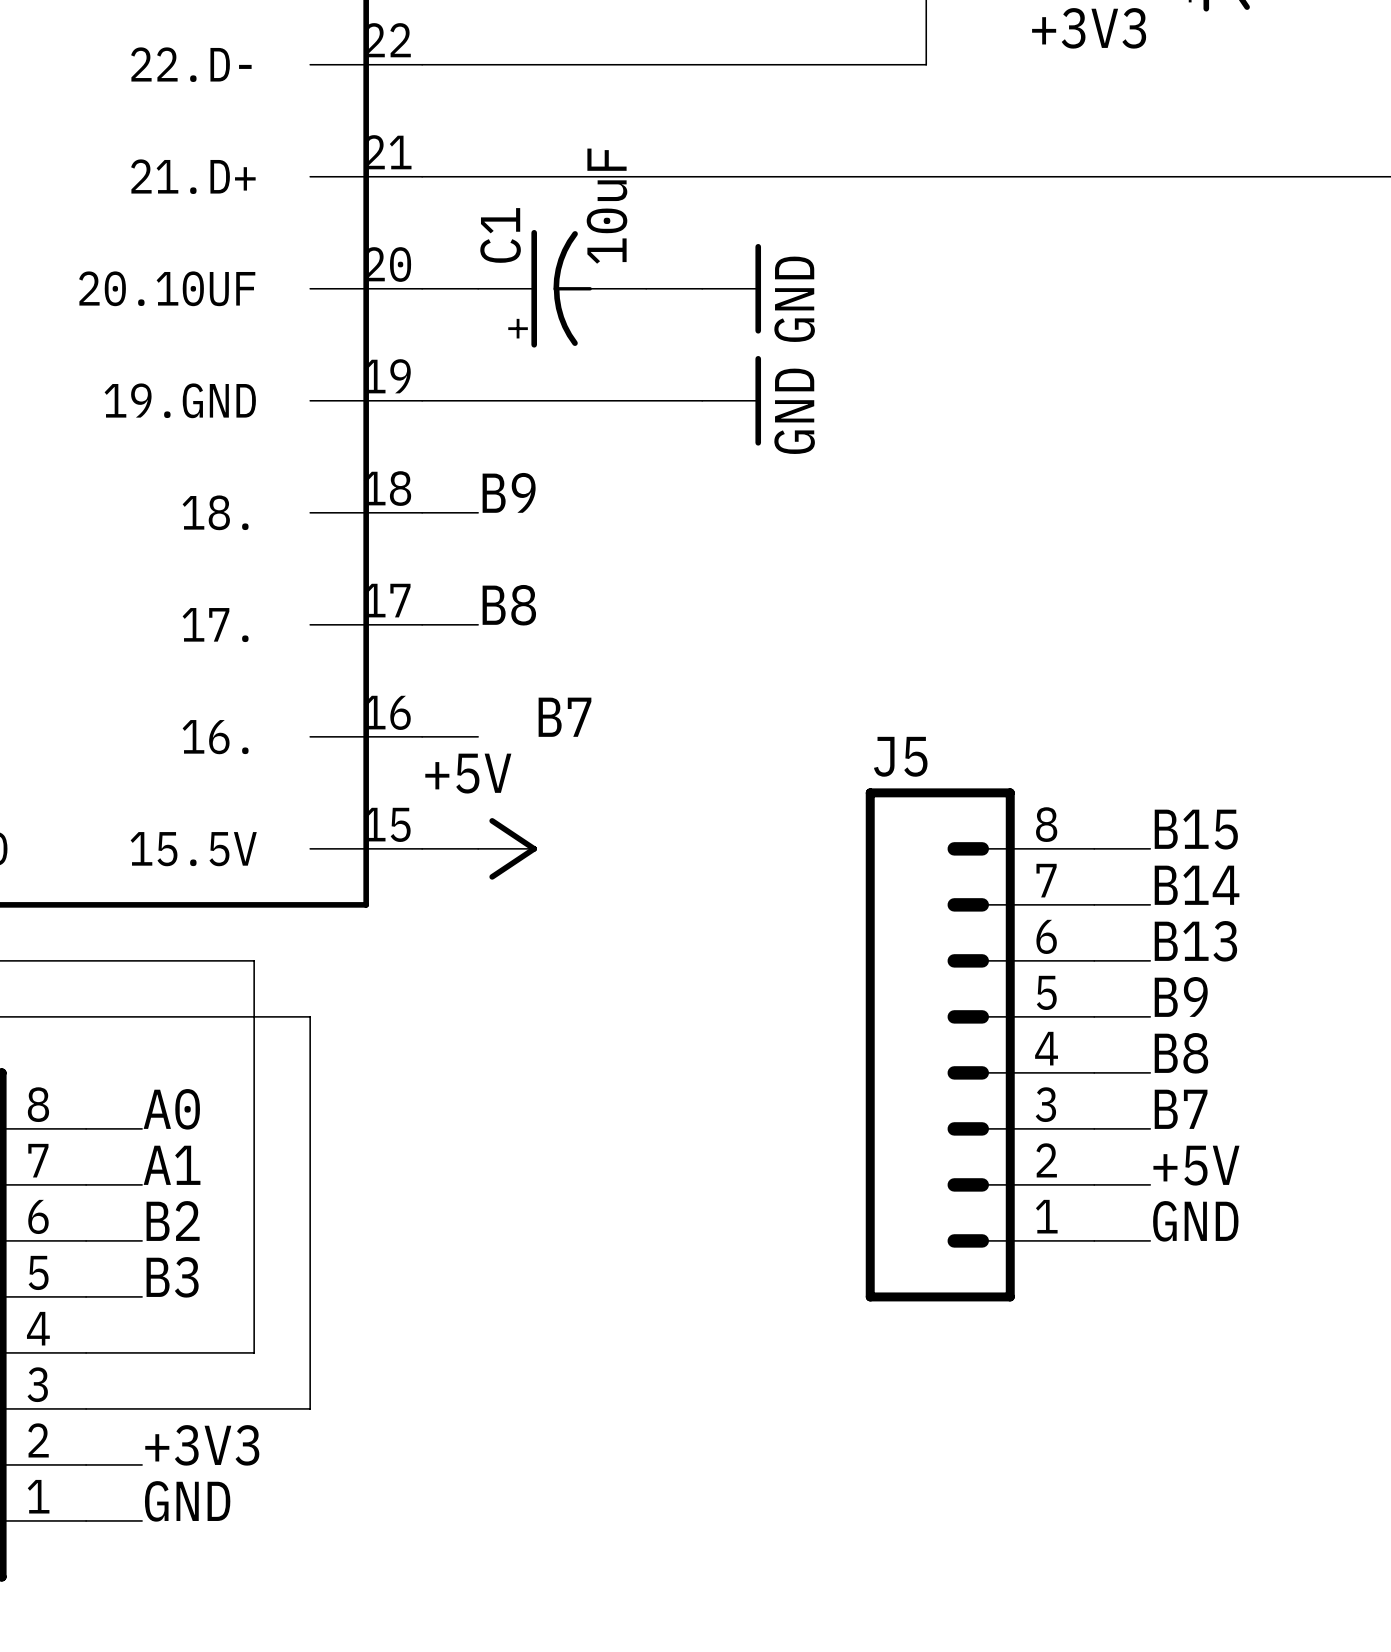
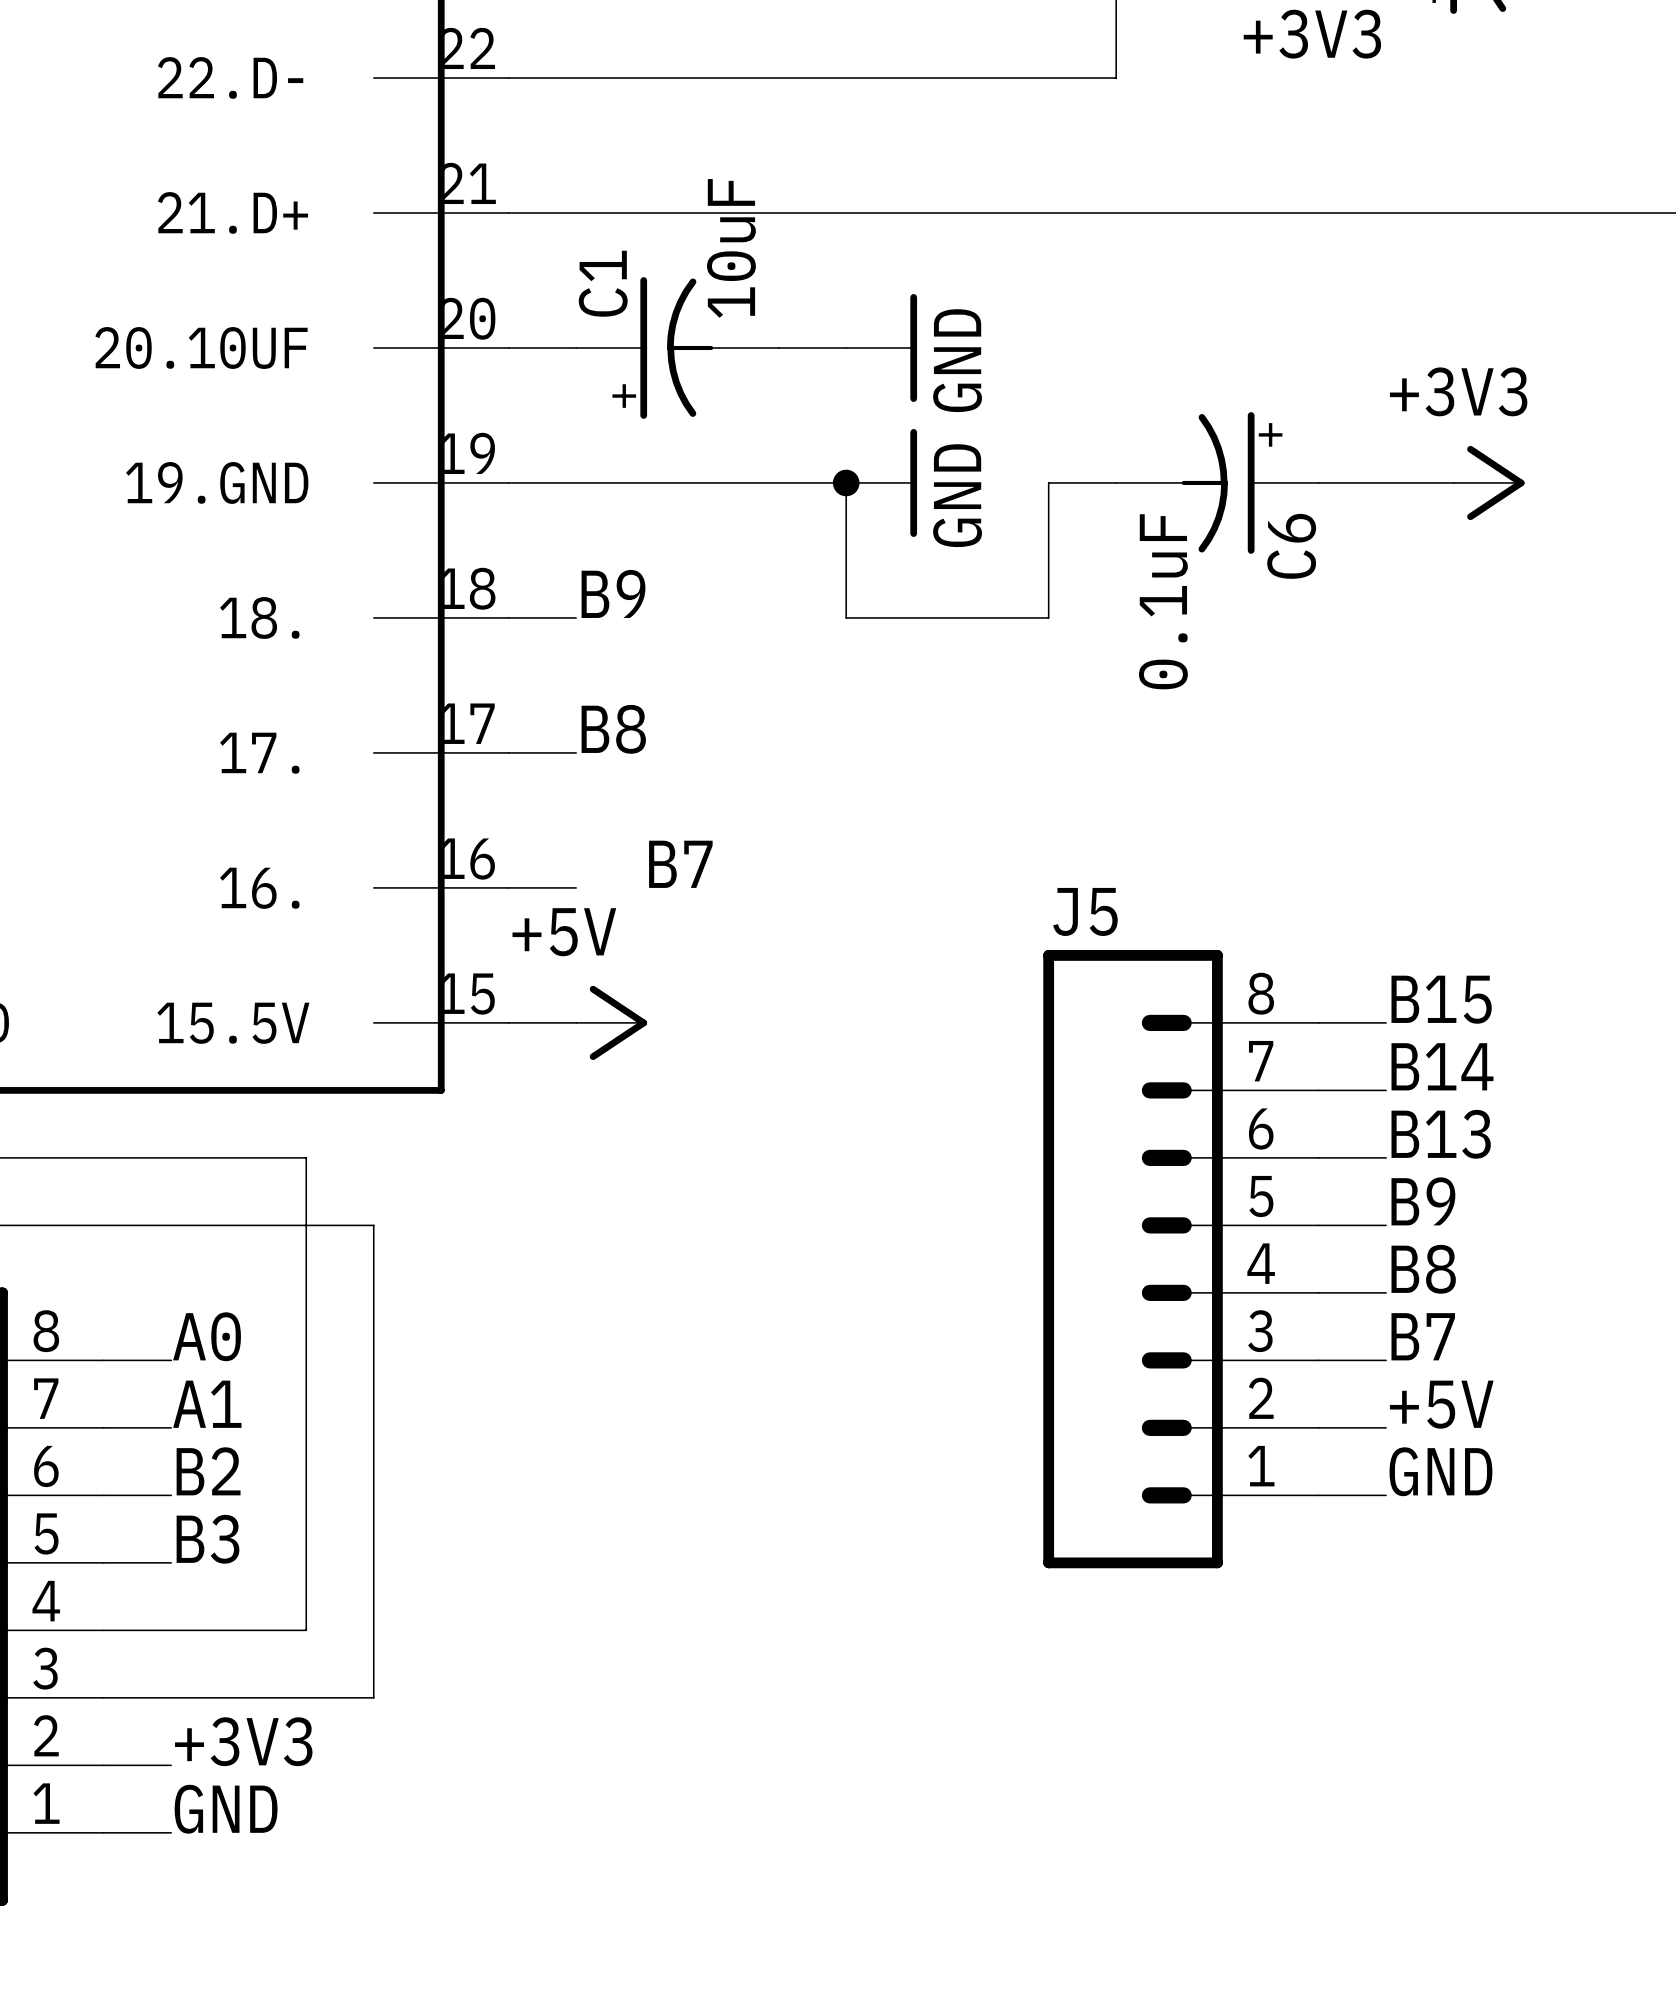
wire: none -> (846, 482) (846, 617) (1048, 617) (1048, 482) (1116, 482)
junction: none -> (846, 482)
C6: none -> 0.1uF (1217, 482)
wire: none -> (1318, 482) (1453, 482)
power symbol: none -> +3V3 (1489, 482)

